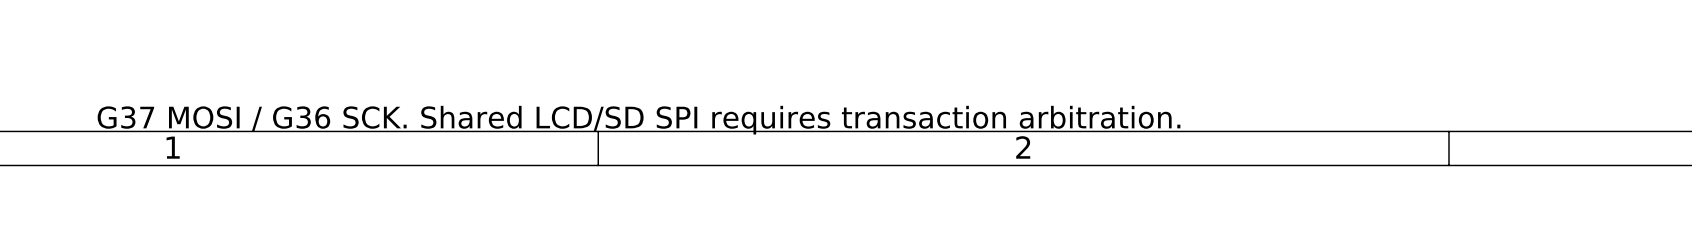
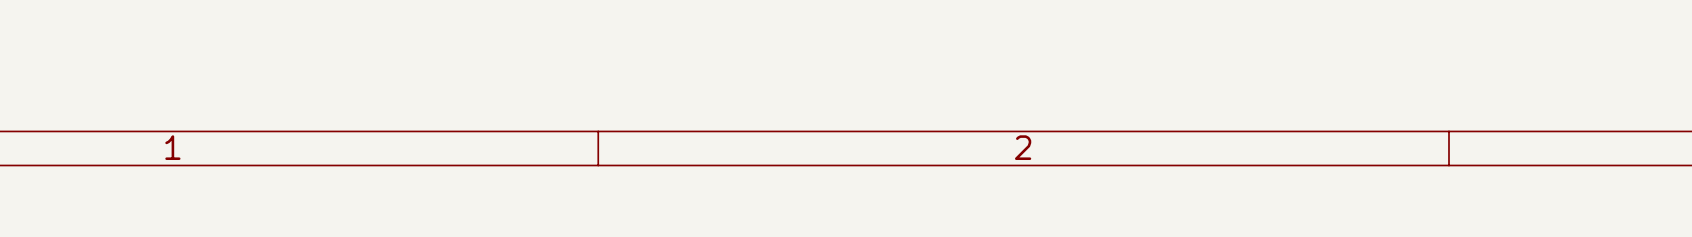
text: G37 MOSI / G36 SCK. Shared LCD/SD SPI requires transaction arbitration. (639, 120) -> none

